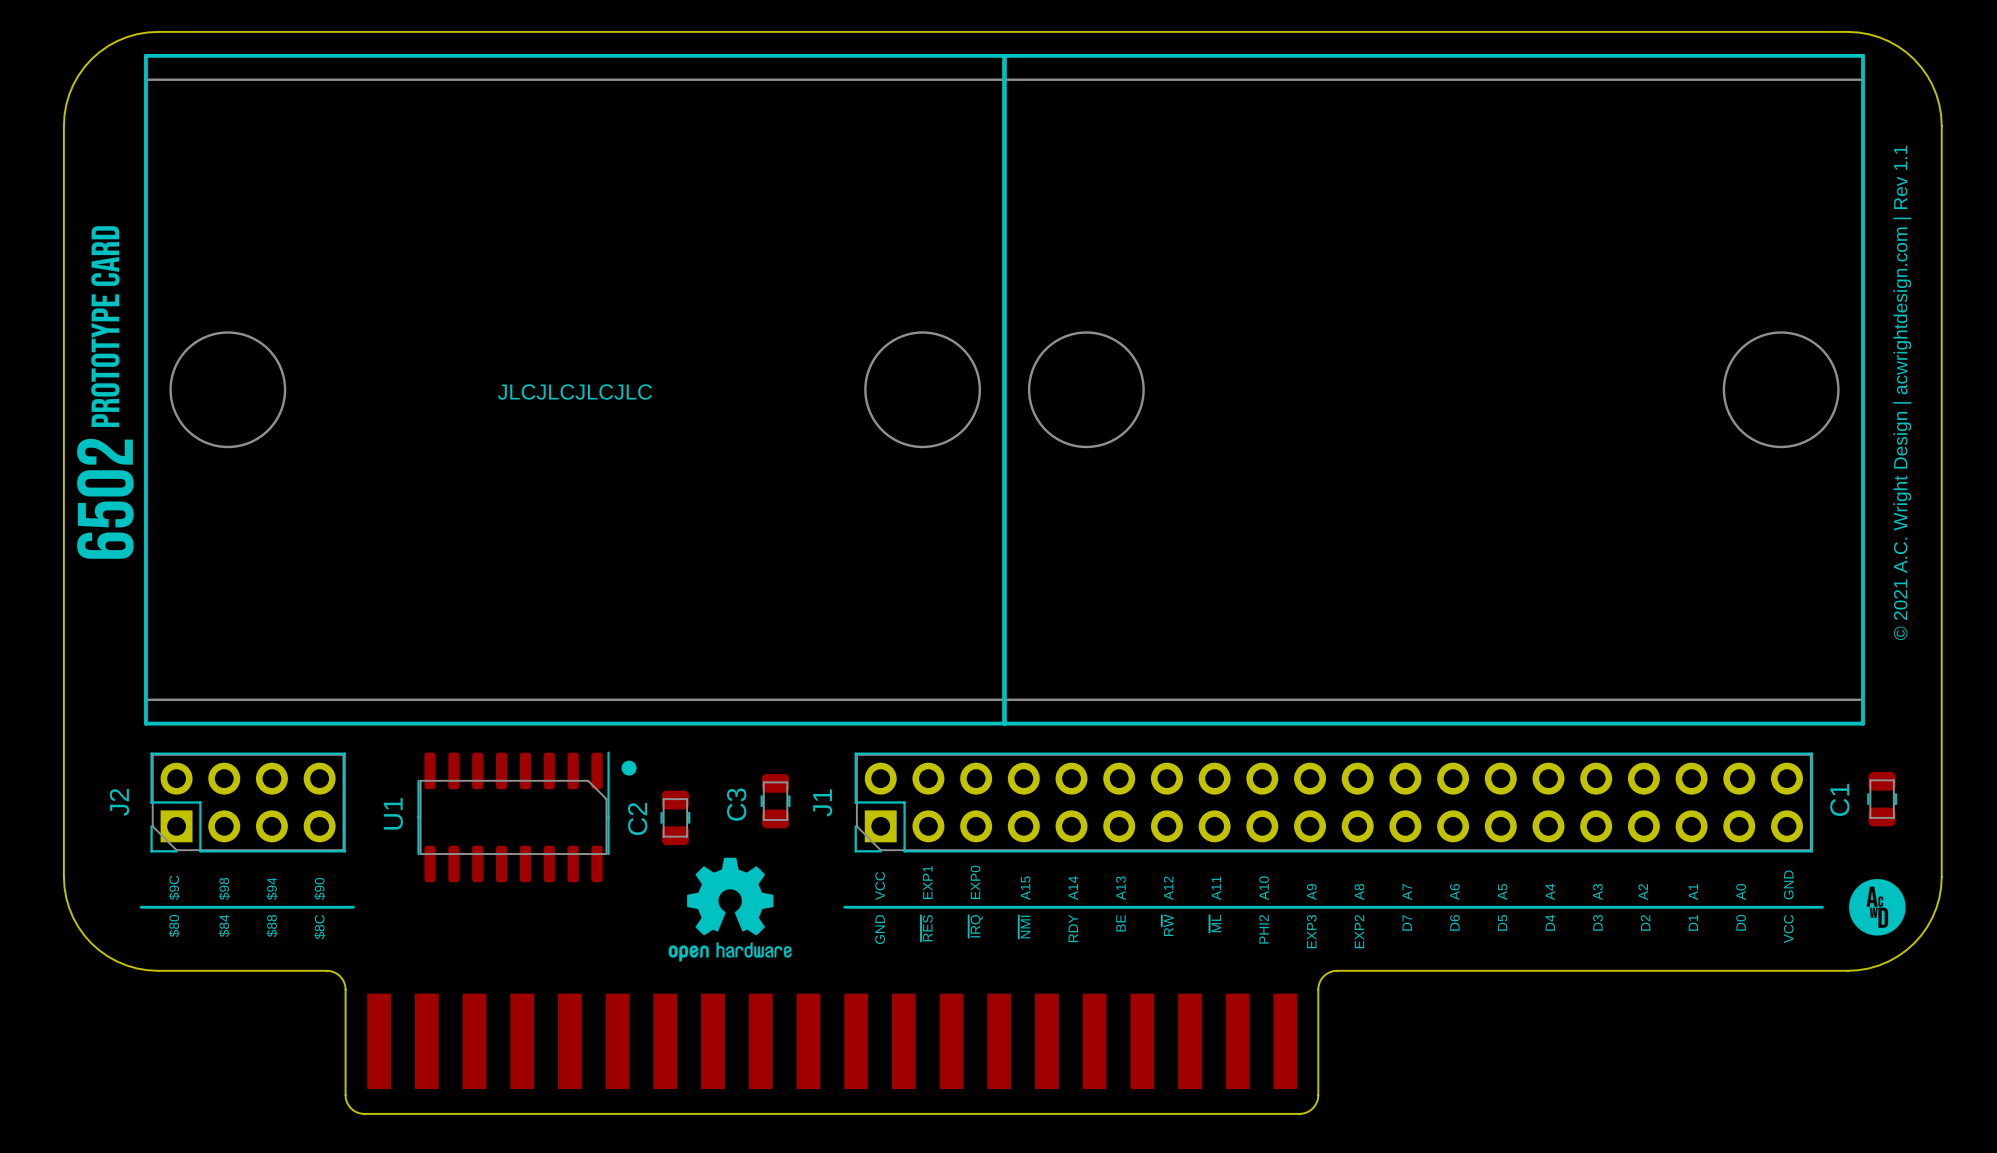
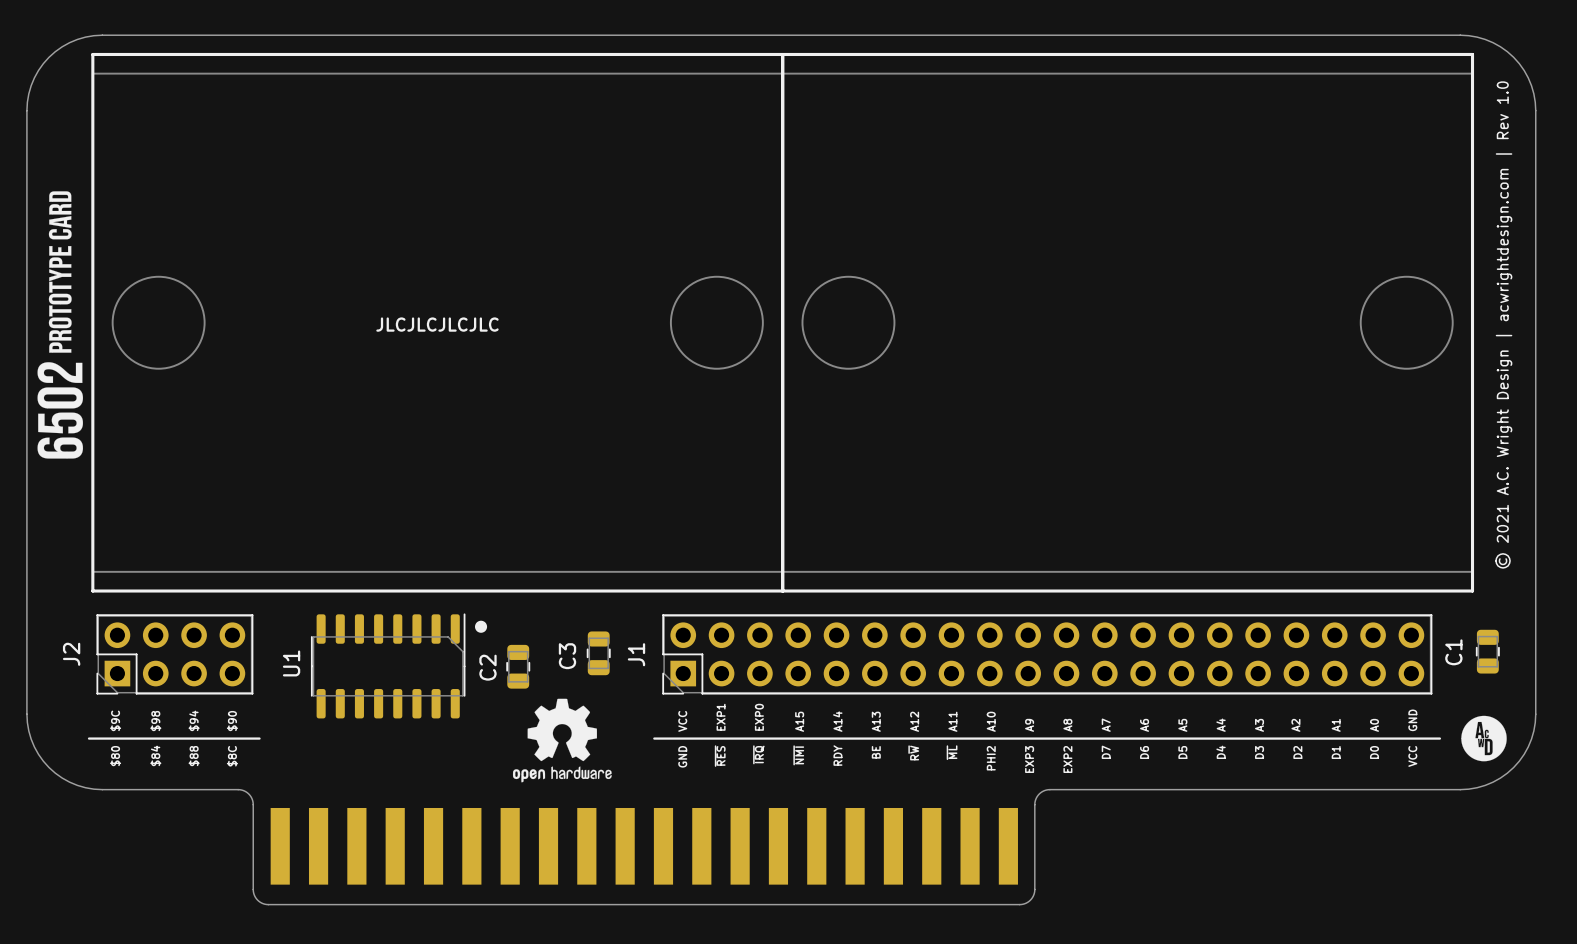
text: © 2021 A.C. Wright Design | acwrightdesign.com | Rev 1.1 (1902, 392) -> © 2021 A.C. Wright Design | acwrightdesign.com | Rev 1.0 (1503, 325)

